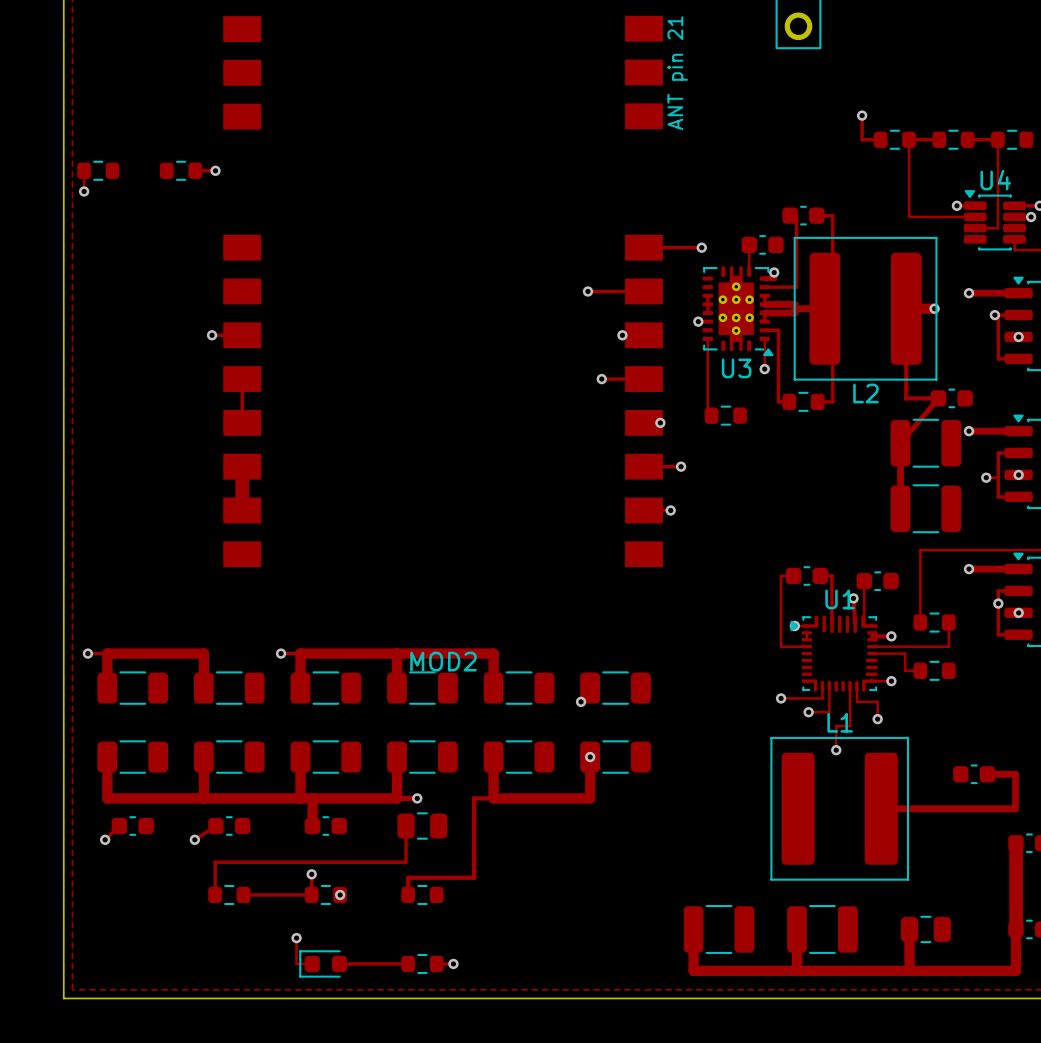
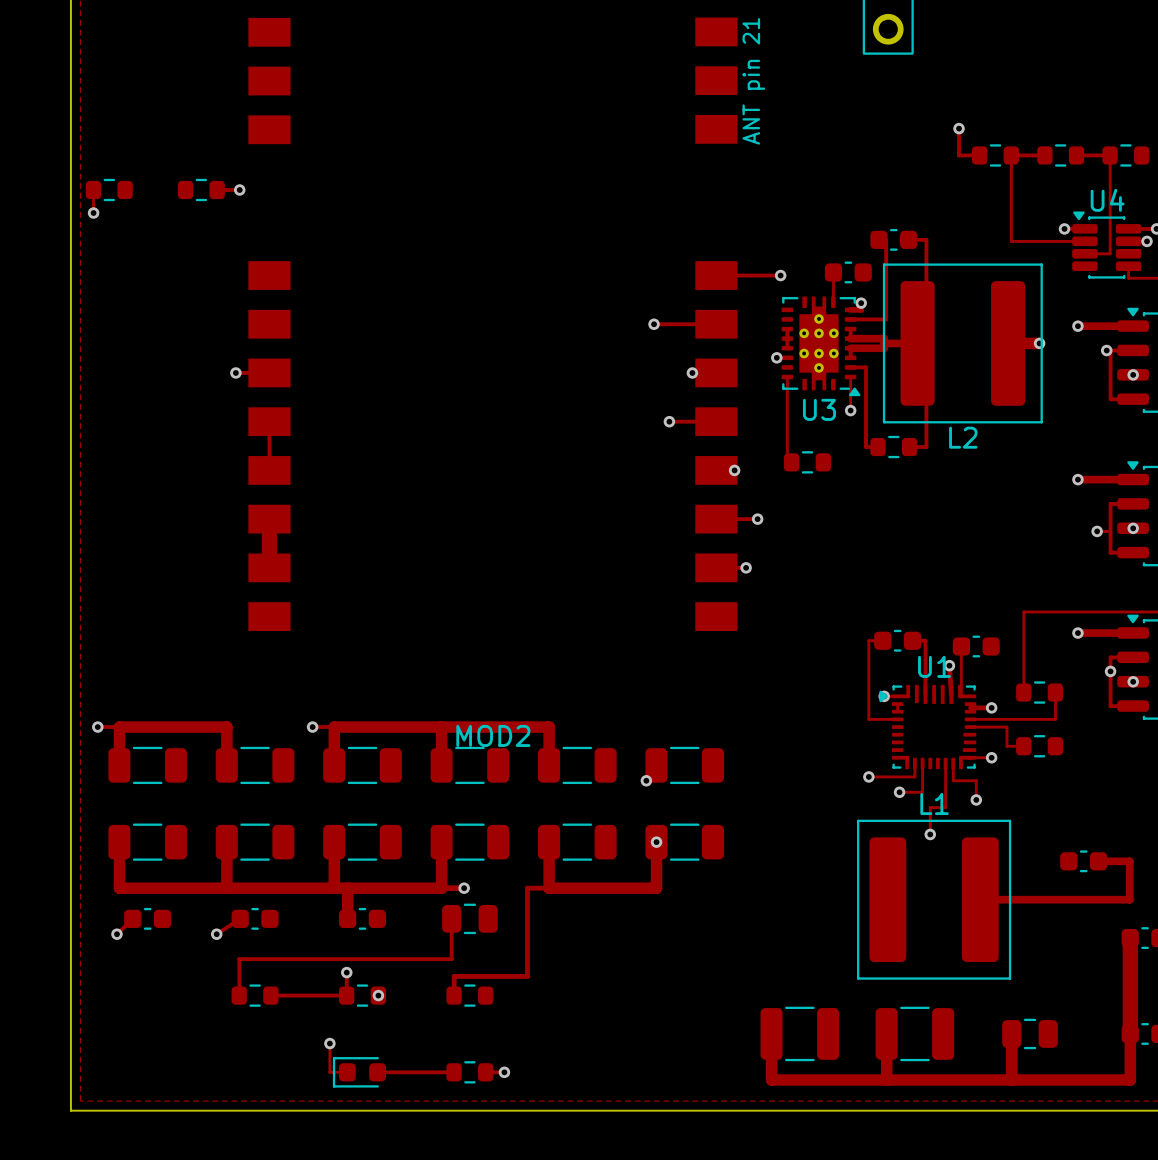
track: (906, 308) (906, 398) (938, 398) (900, 443) (900, 508) -> none
part: (951, 398) -> none
part: (925, 443) -> none
part: (925, 508) -> none

